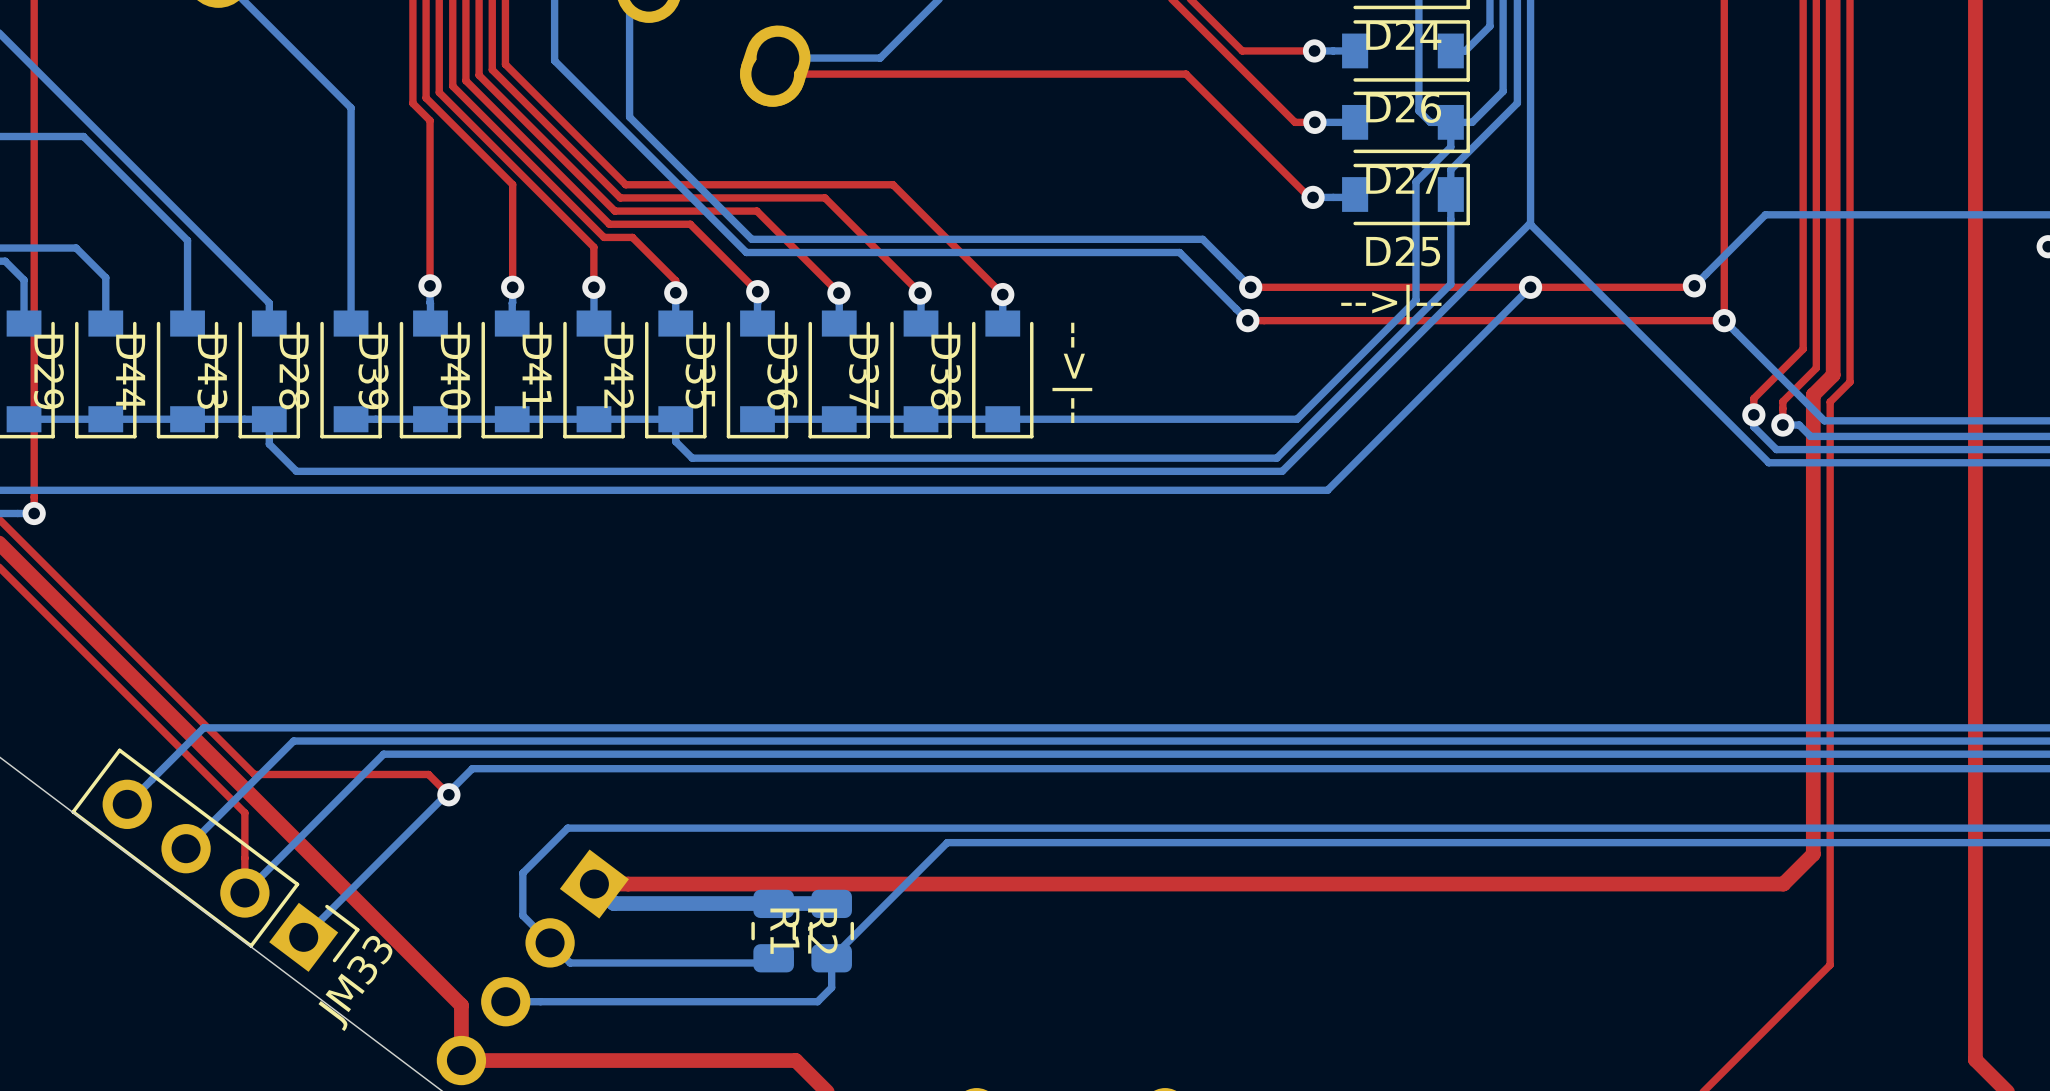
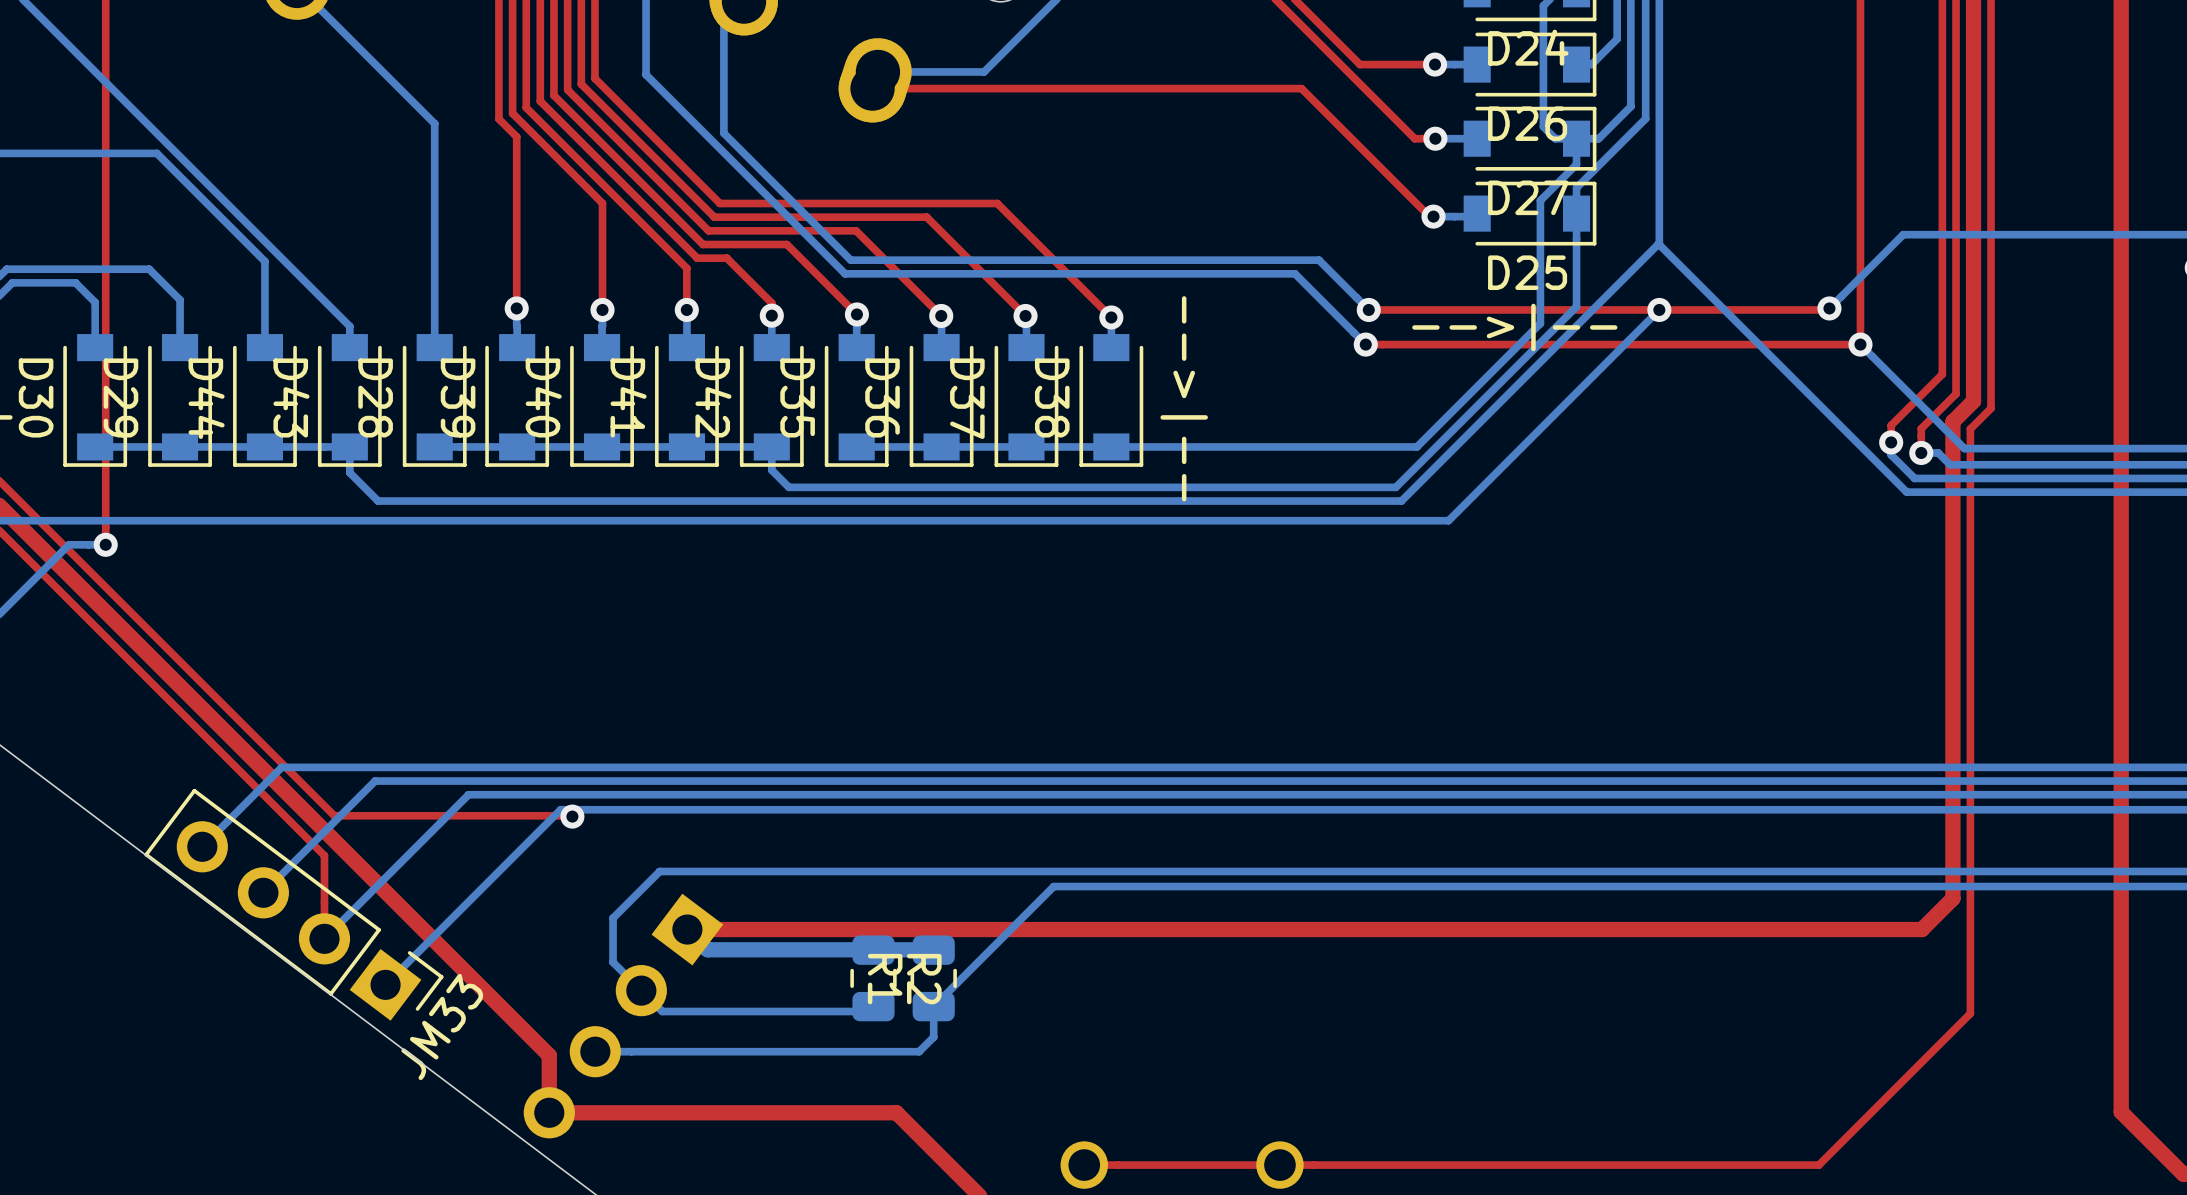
top track: (428, 774) (448, 794) -> (515, 815) (572, 816)
via position: (448, 794) -> (572, 816)

